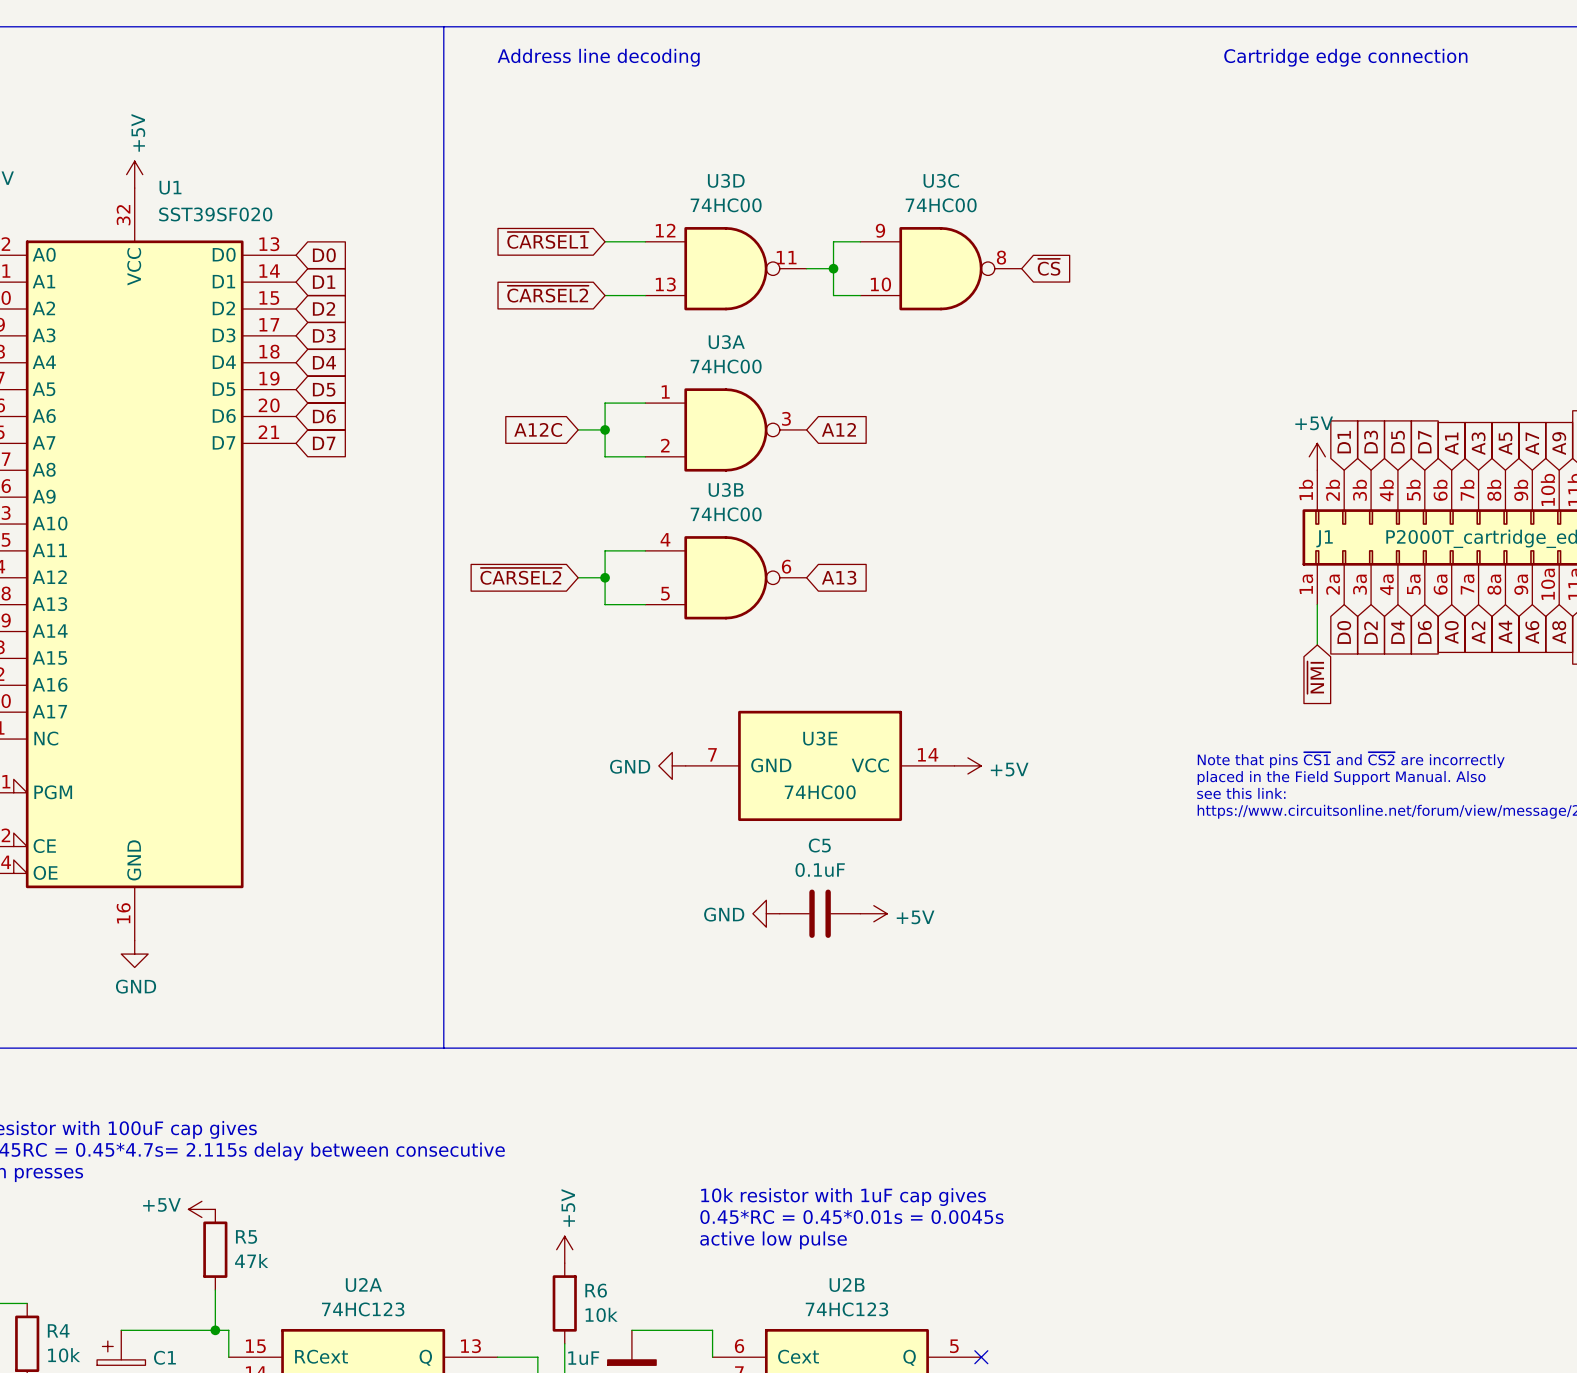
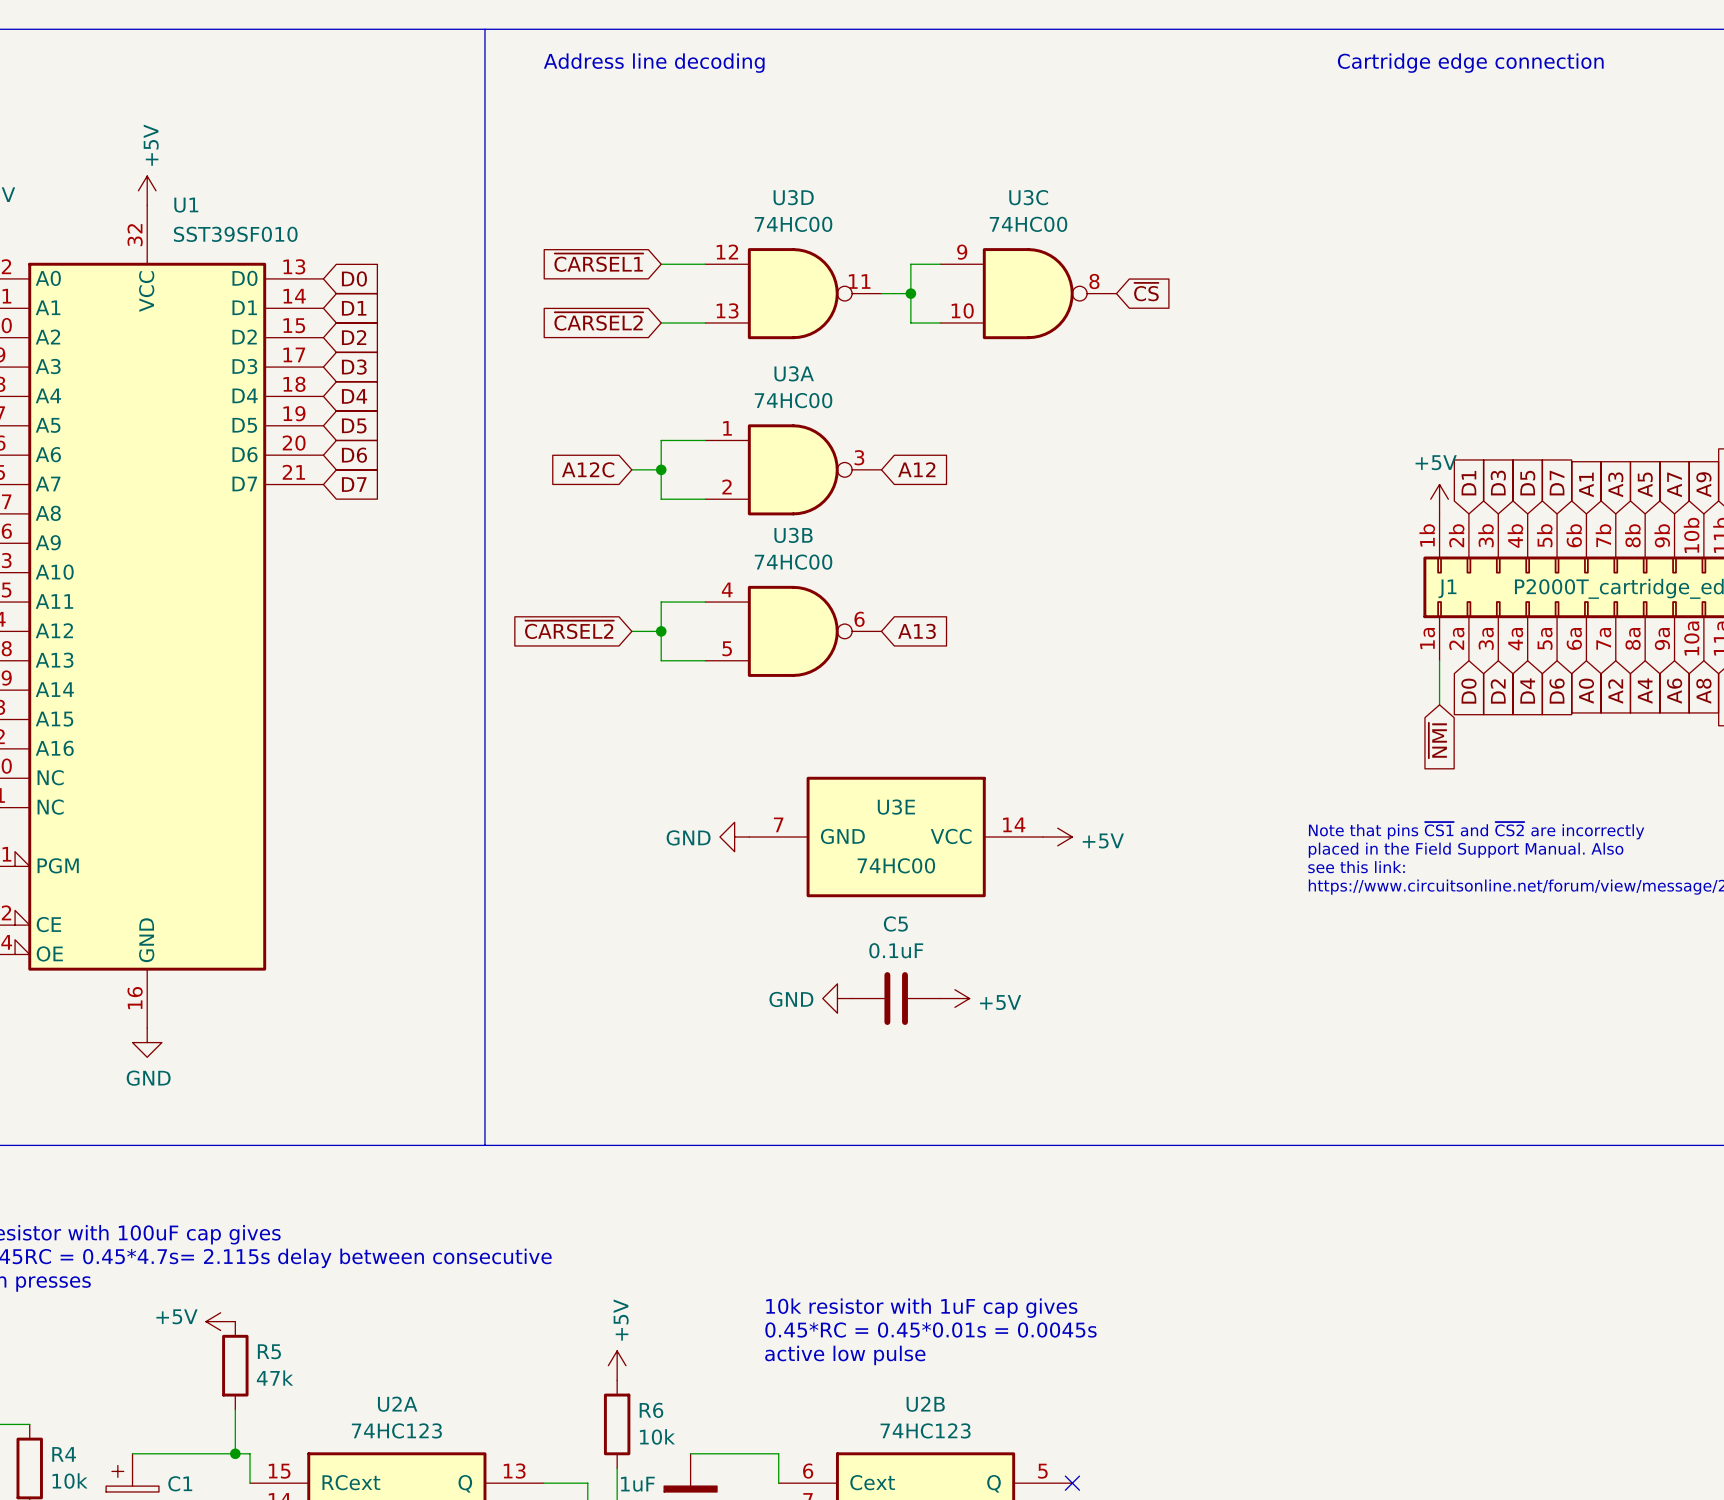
U1 value: SST39SF020 (215, 214) -> SST39SF010 (235, 234)
U1 pin name: A17 (49, 711) -> NC (50, 777)

